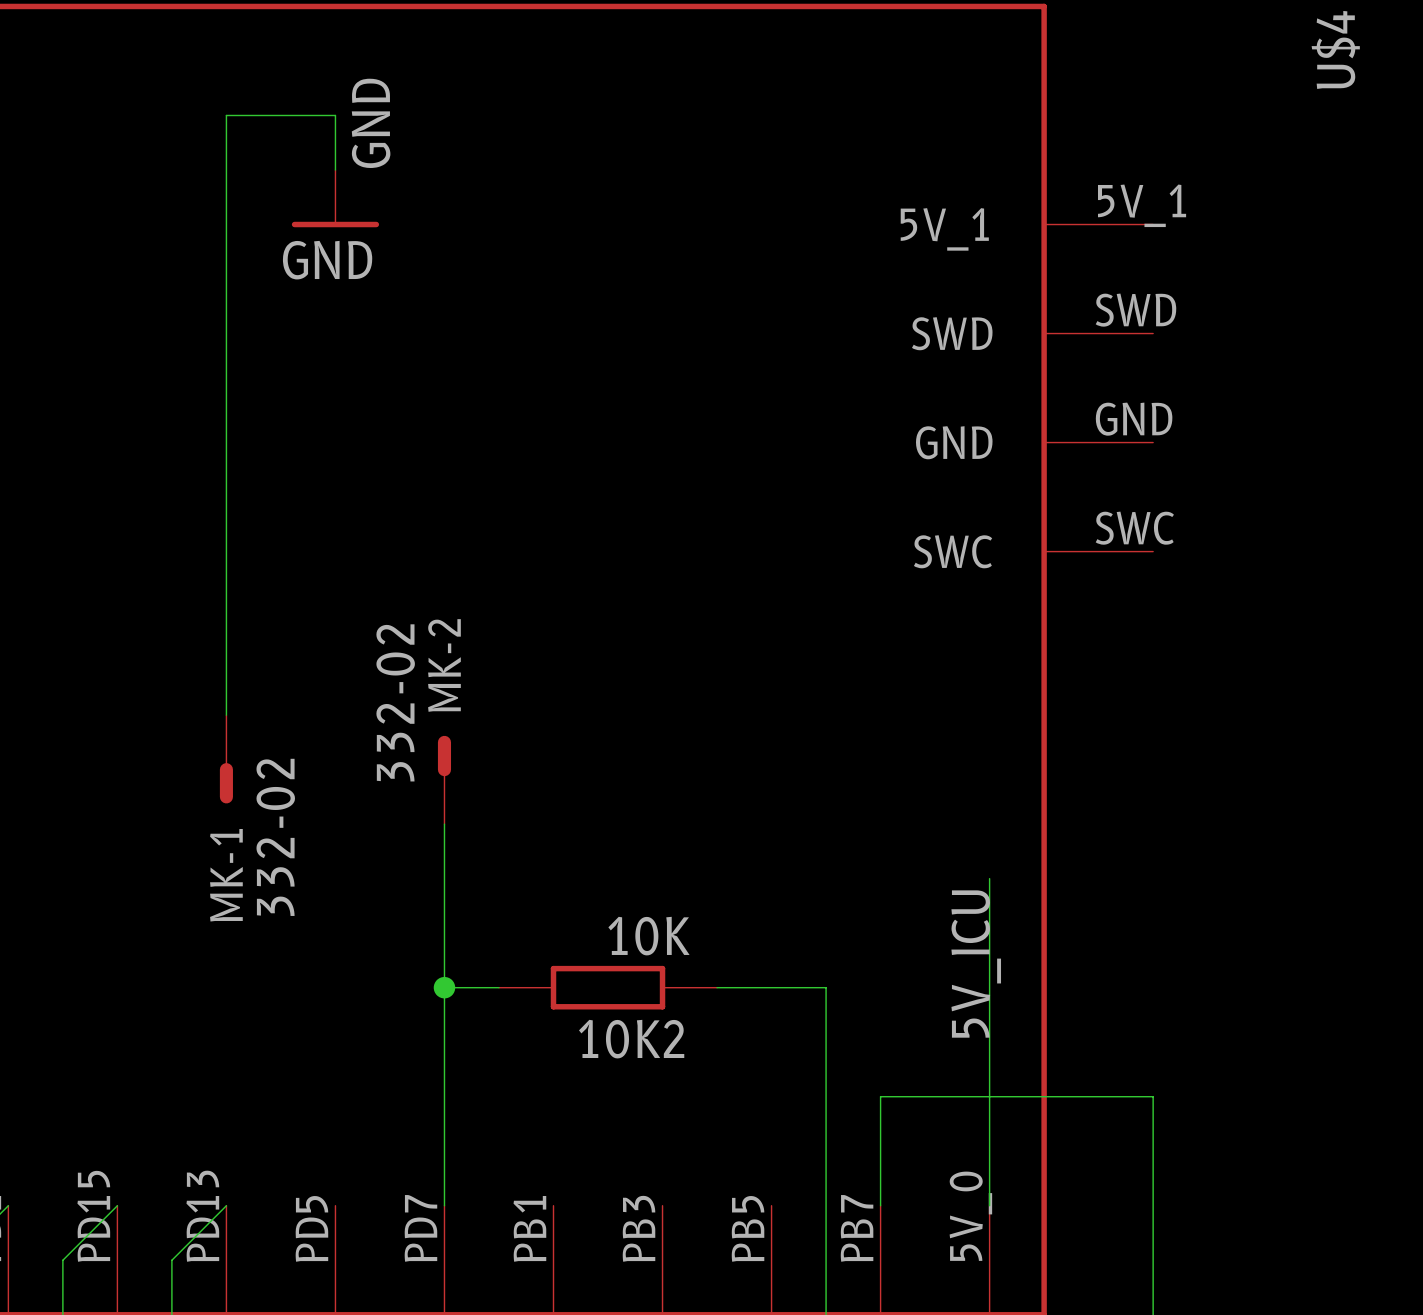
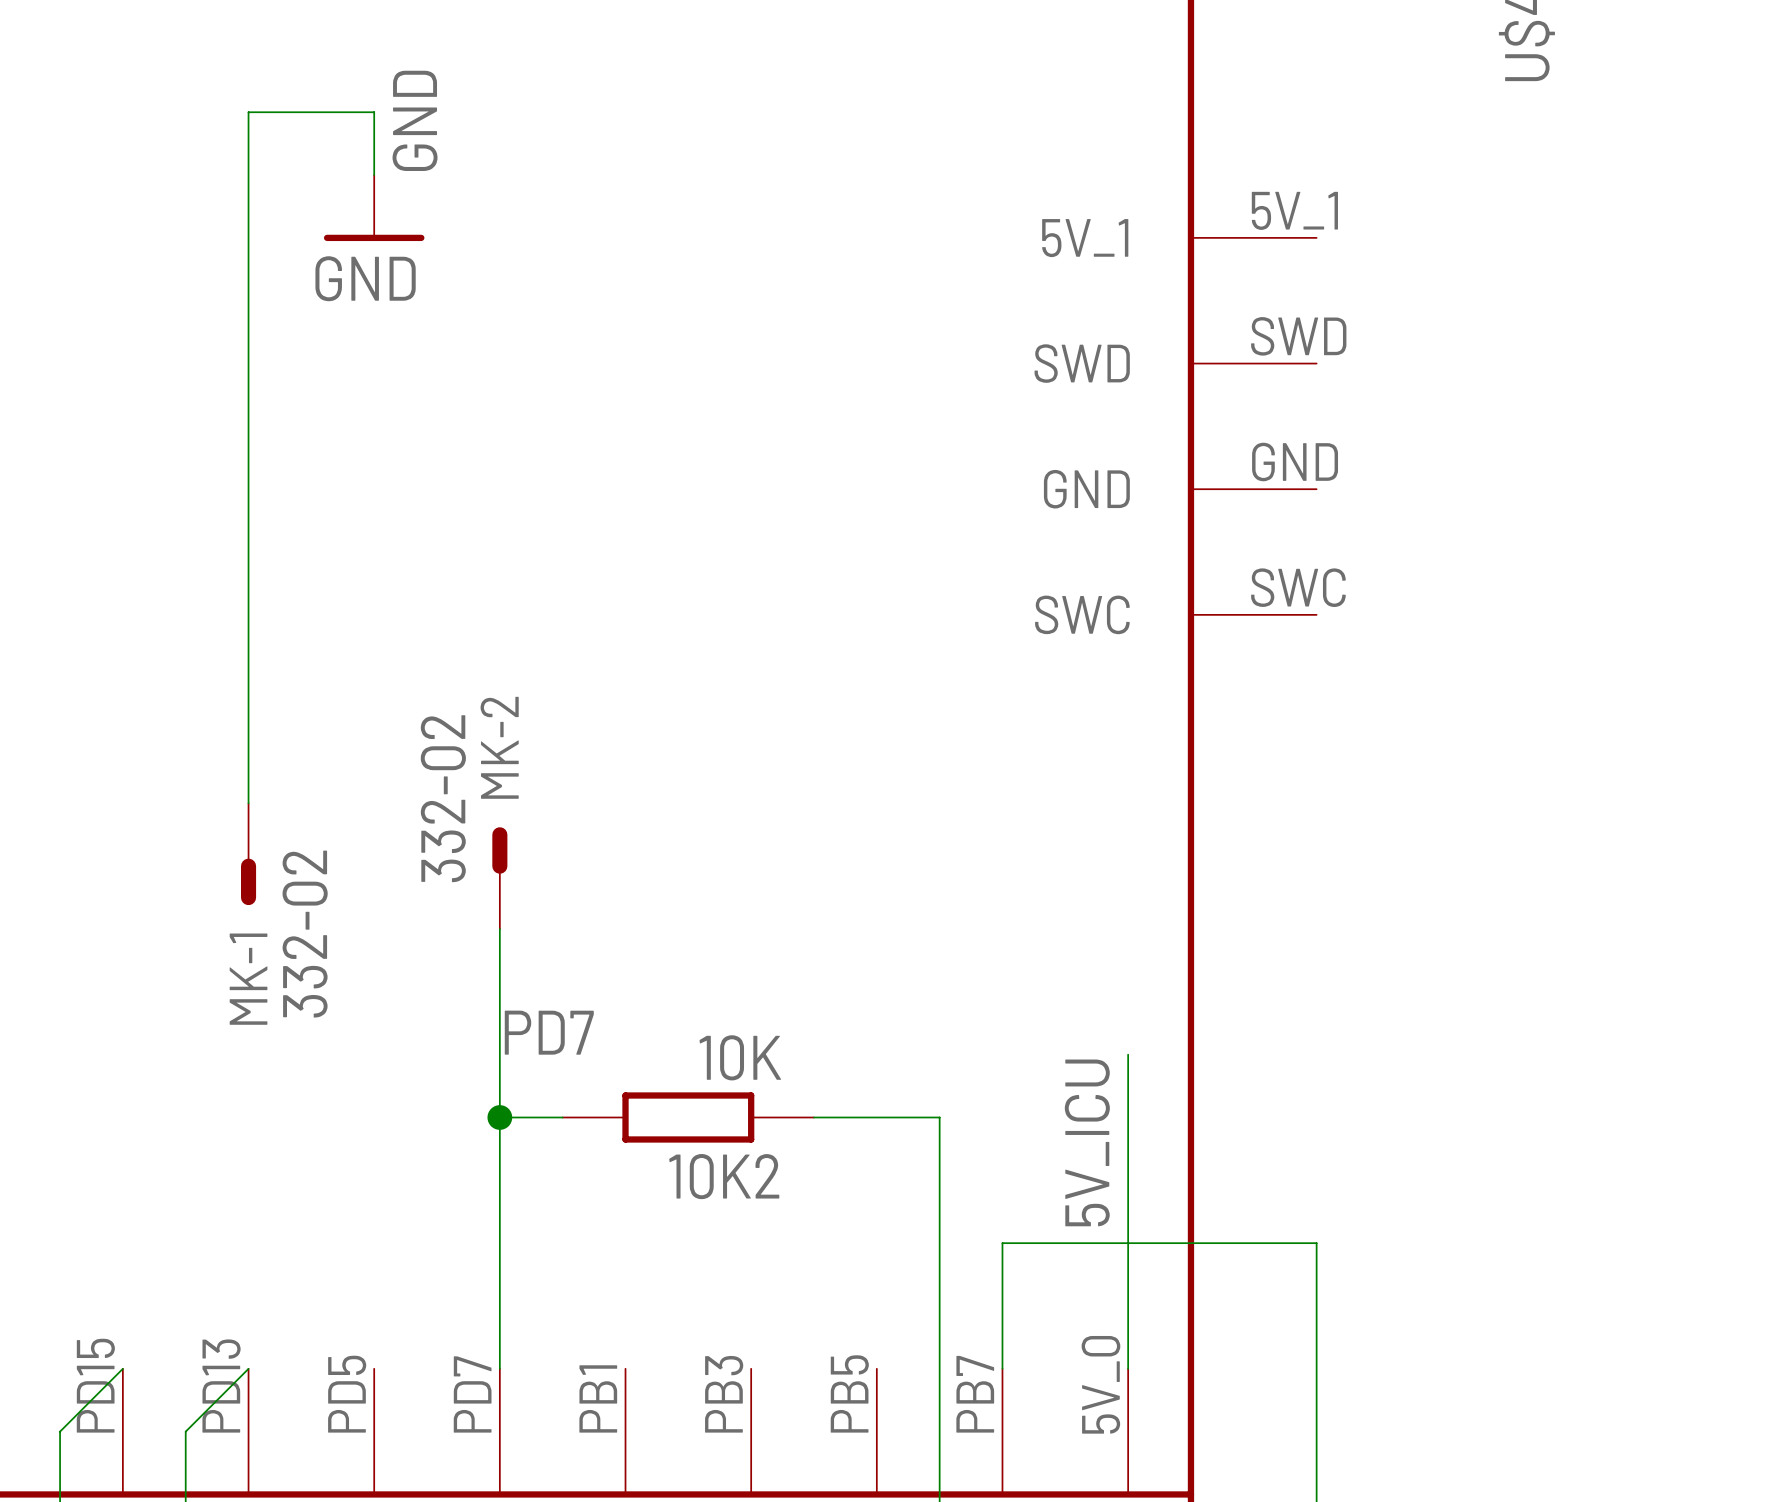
wire: (989, 878) (989, 933) -> none
label: none -> PD7 (549, 1032)
label position: 5V_ICU (976, 964) -> 5V_ICU (1087, 1142)

